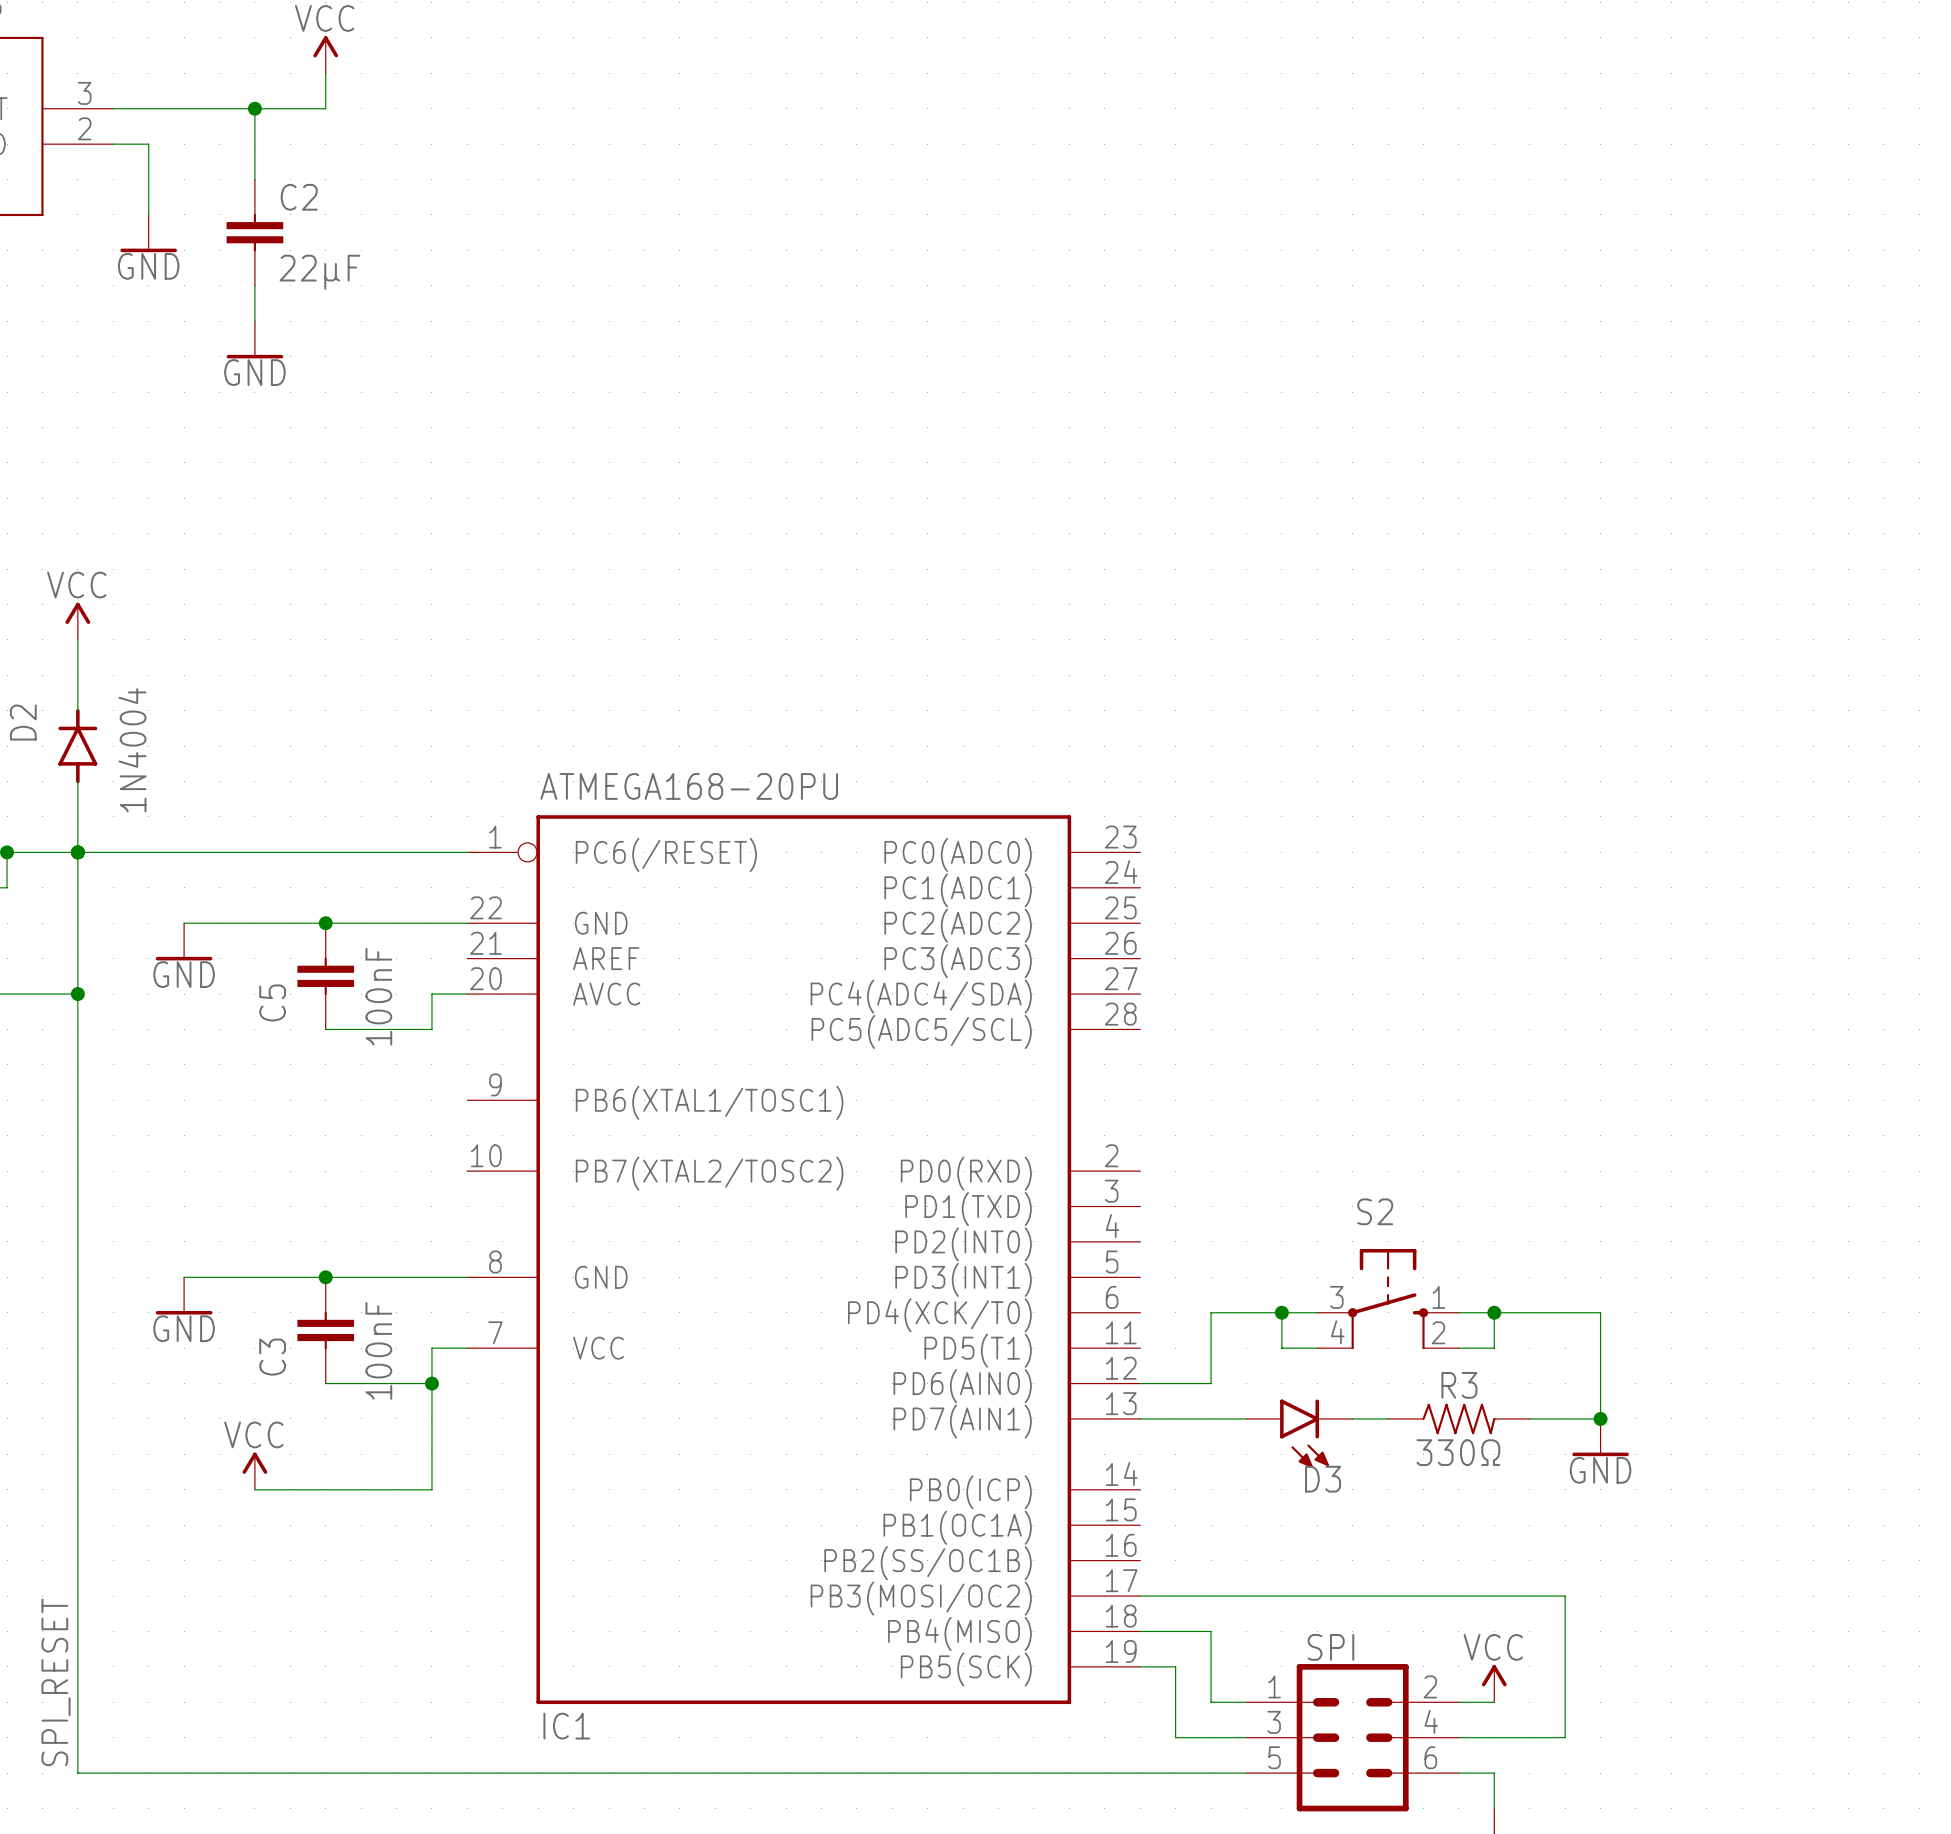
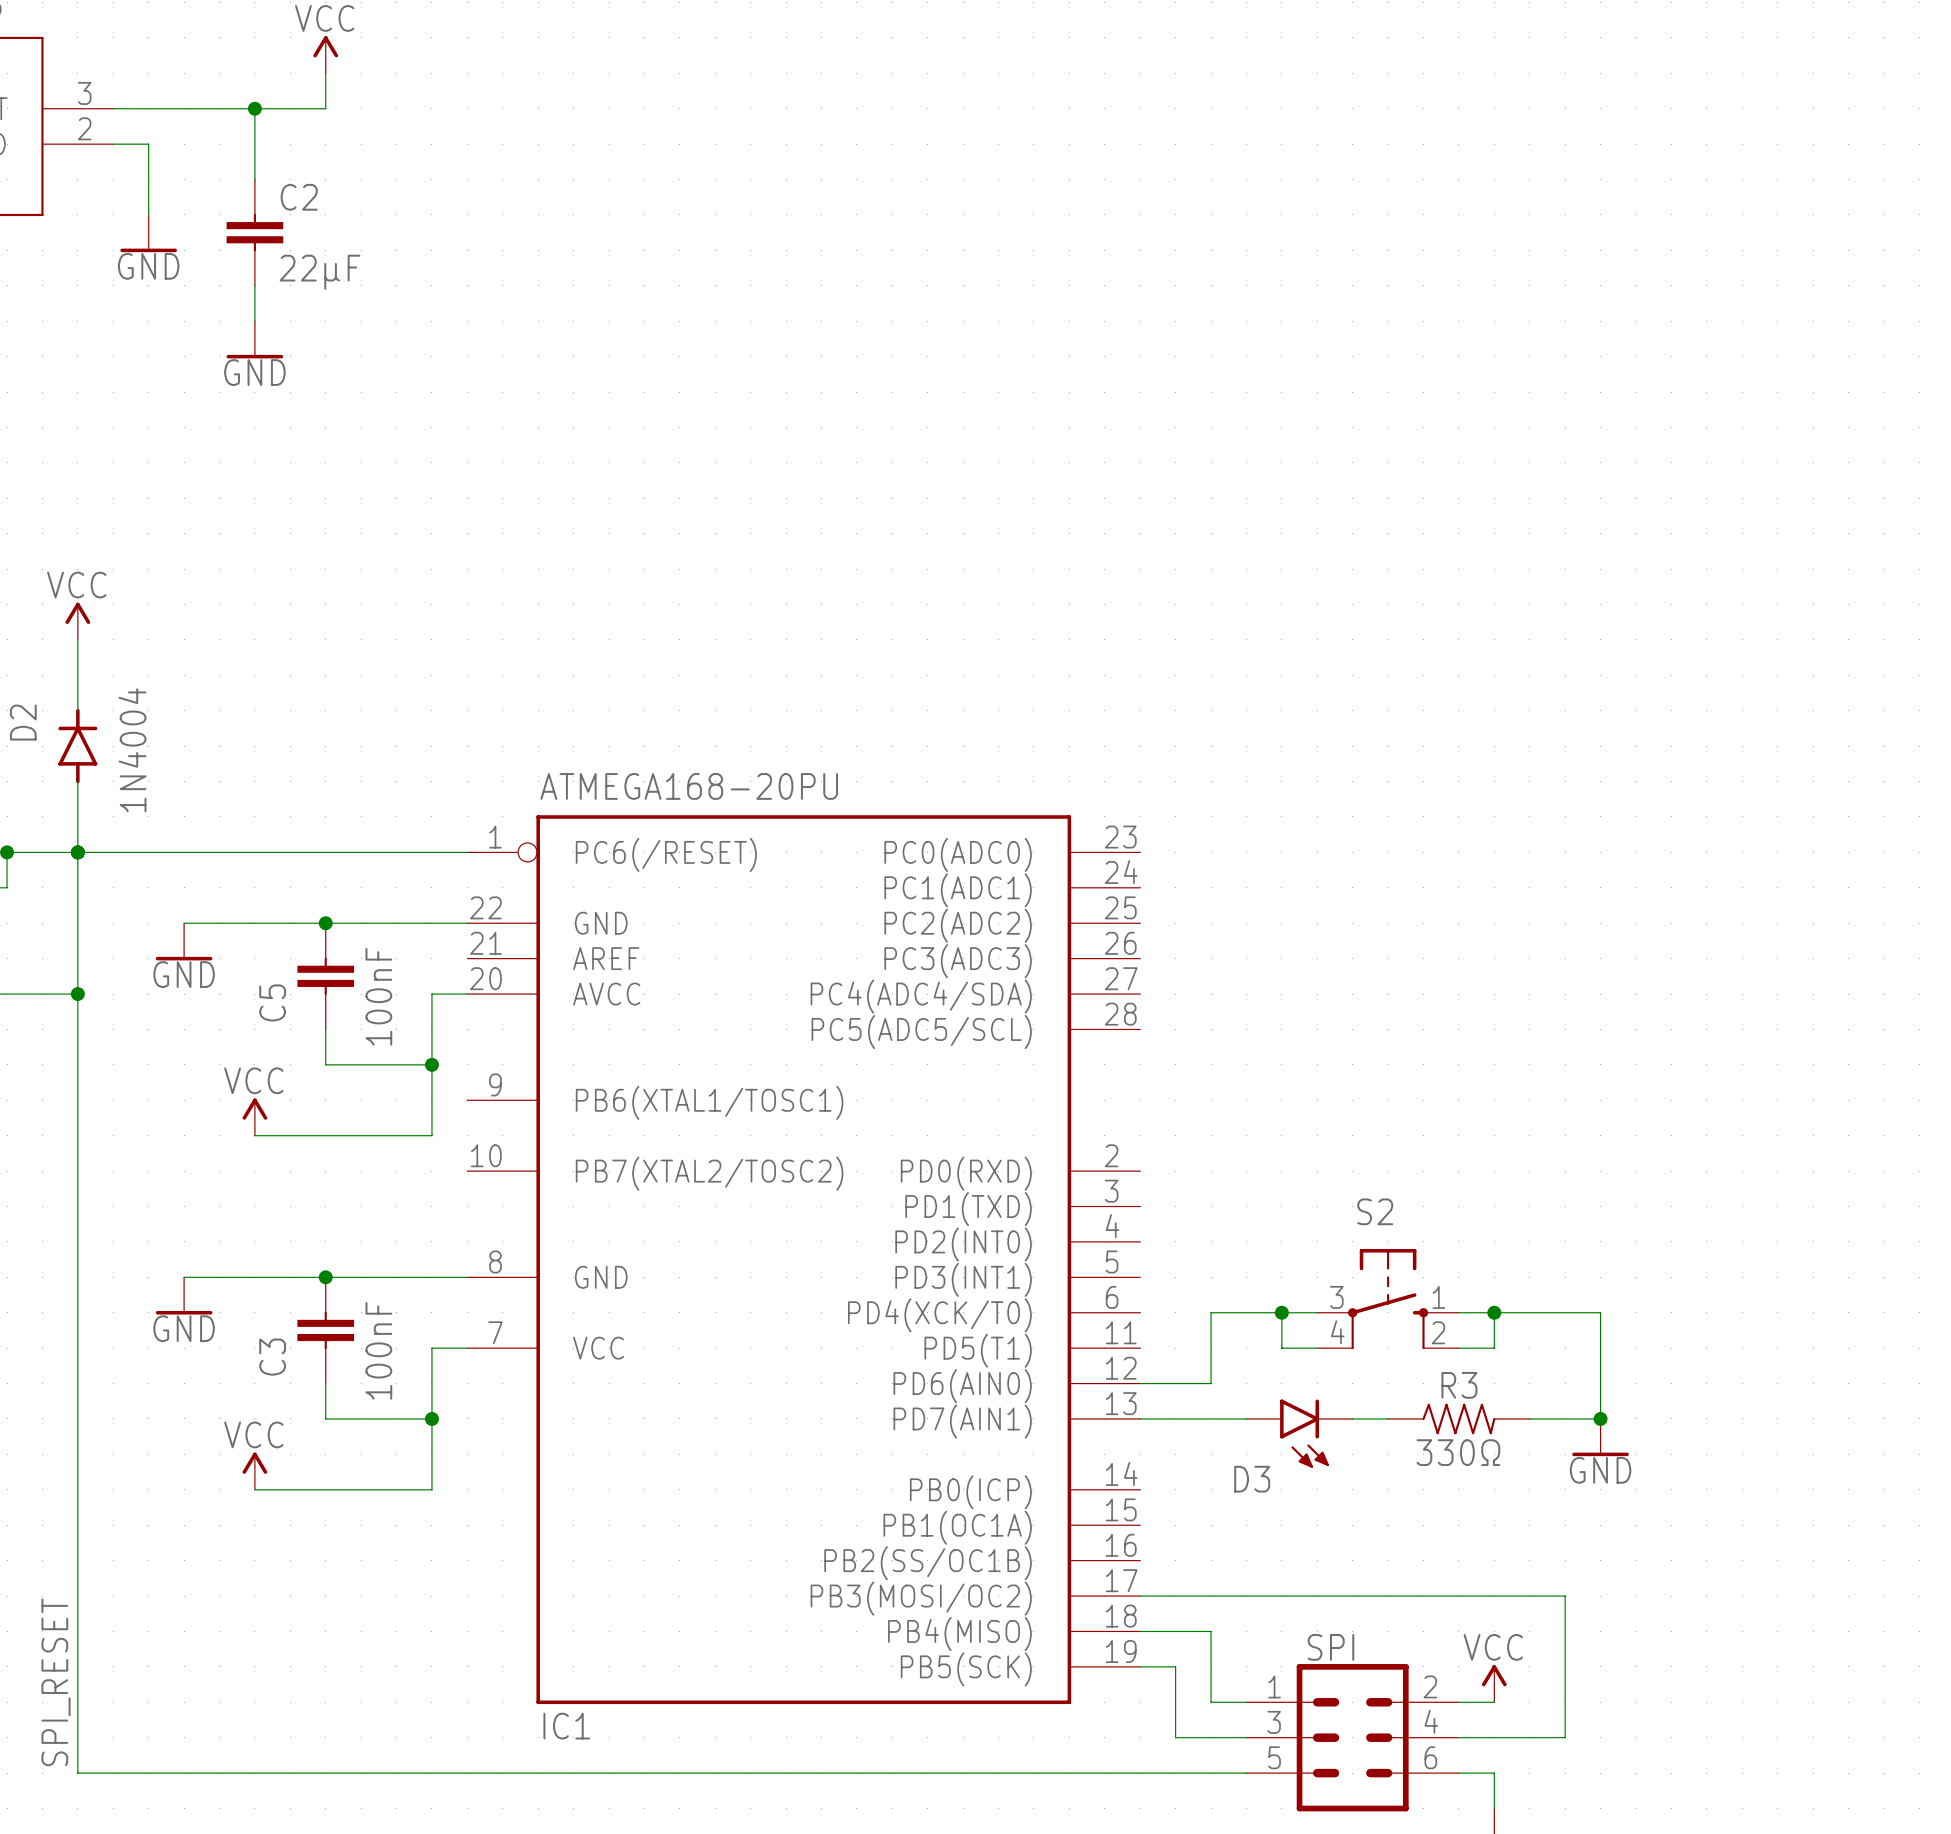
wire: (325, 1029) (431, 1029) -> (325, 1029) (325, 1064) (431, 1064)
wire: none -> (431, 1029) (431, 1135) (254, 1135)
junction: none -> (431, 1064)
power symbol: none -> VCC (254, 1117)
wire: (325, 1383) (431, 1383) -> (325, 1383) (325, 1418) (431, 1418)
junction position: (431, 1383) -> (431, 1418)
D3 name position: D3 (1323, 1479) -> D3 (1252, 1479)

